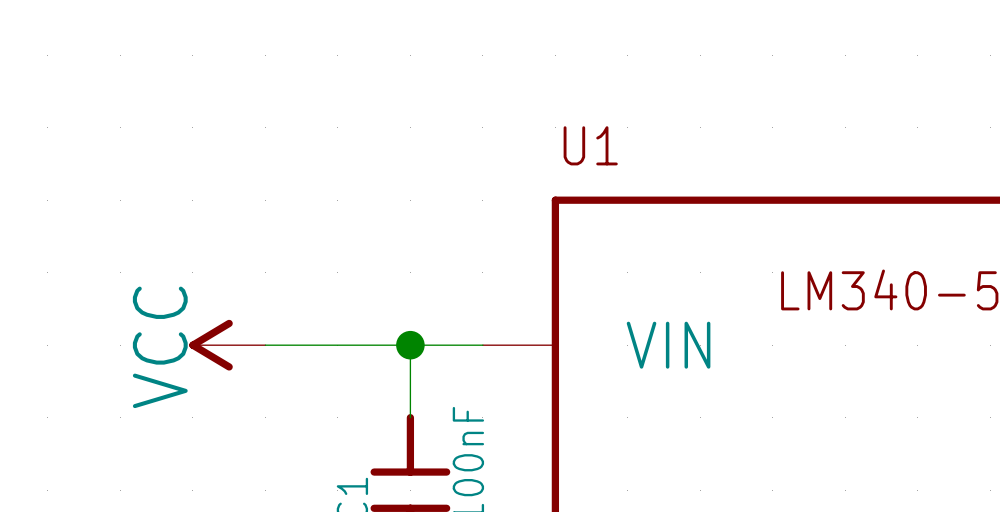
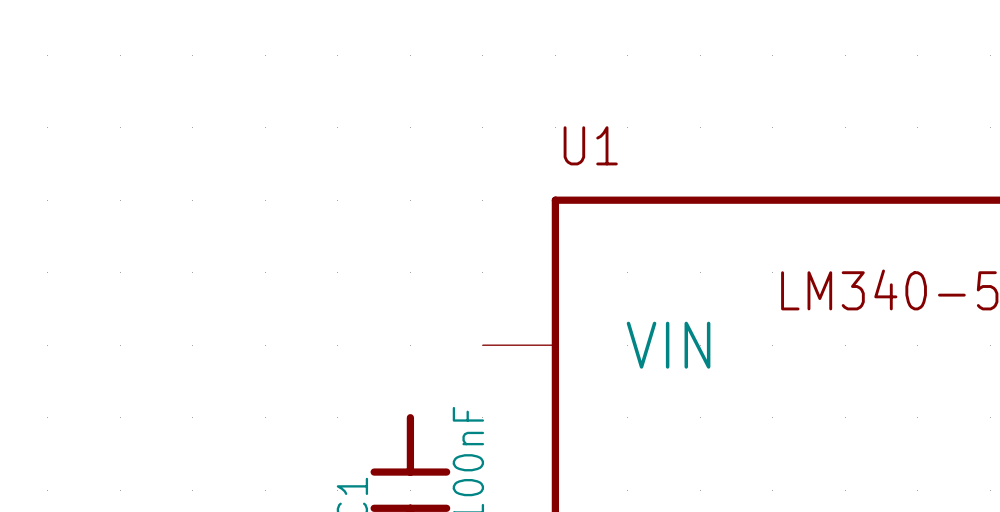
power symbol: VCC (227, 345) -> none
wire: (265, 345) (482, 345) -> none
wire: (410, 345) (410, 417) -> none
junction: (410, 345) -> none

